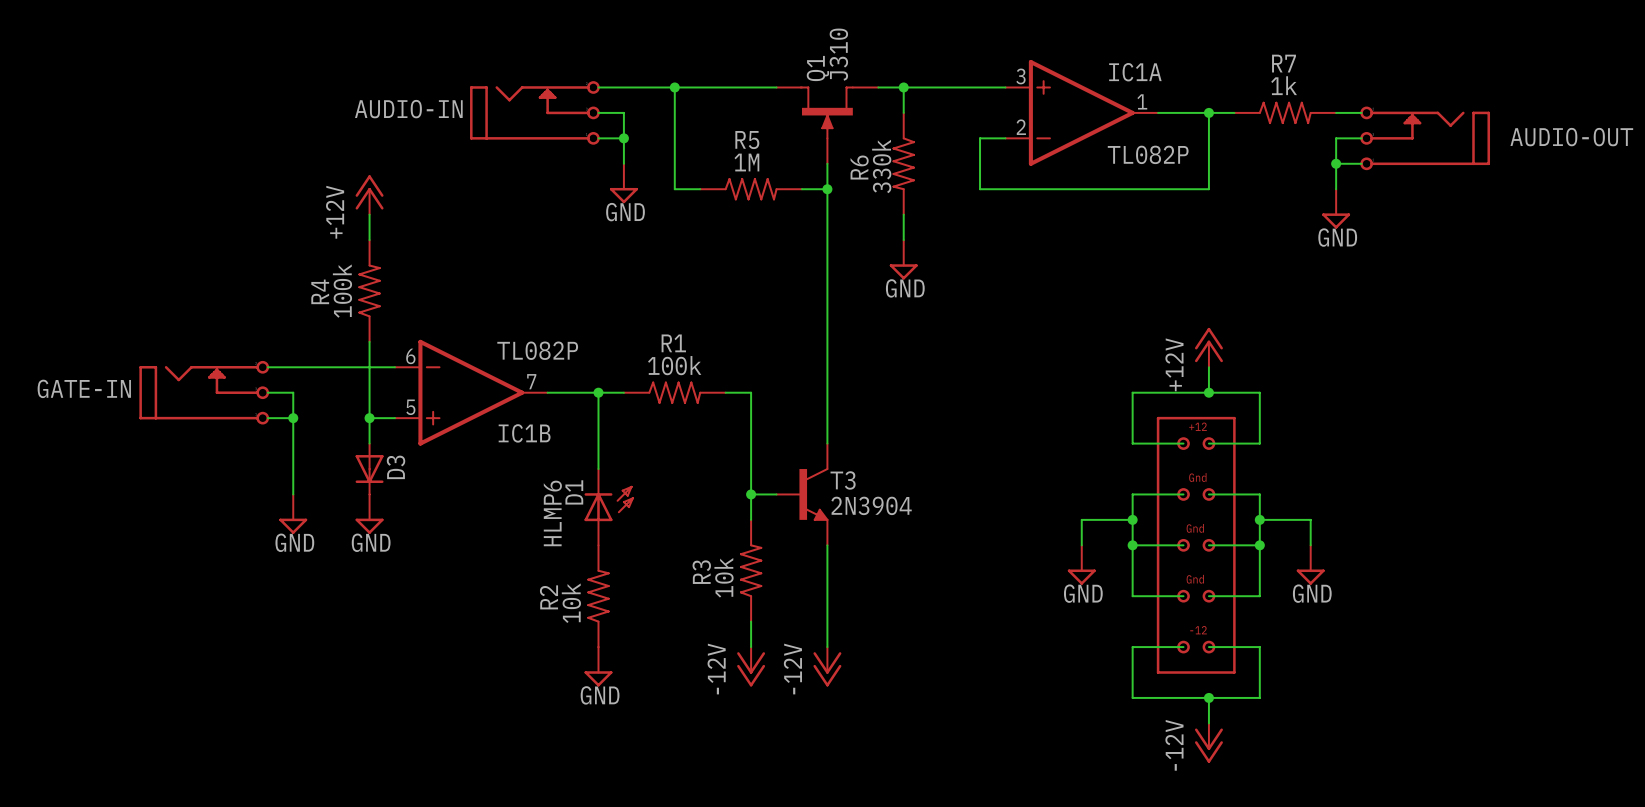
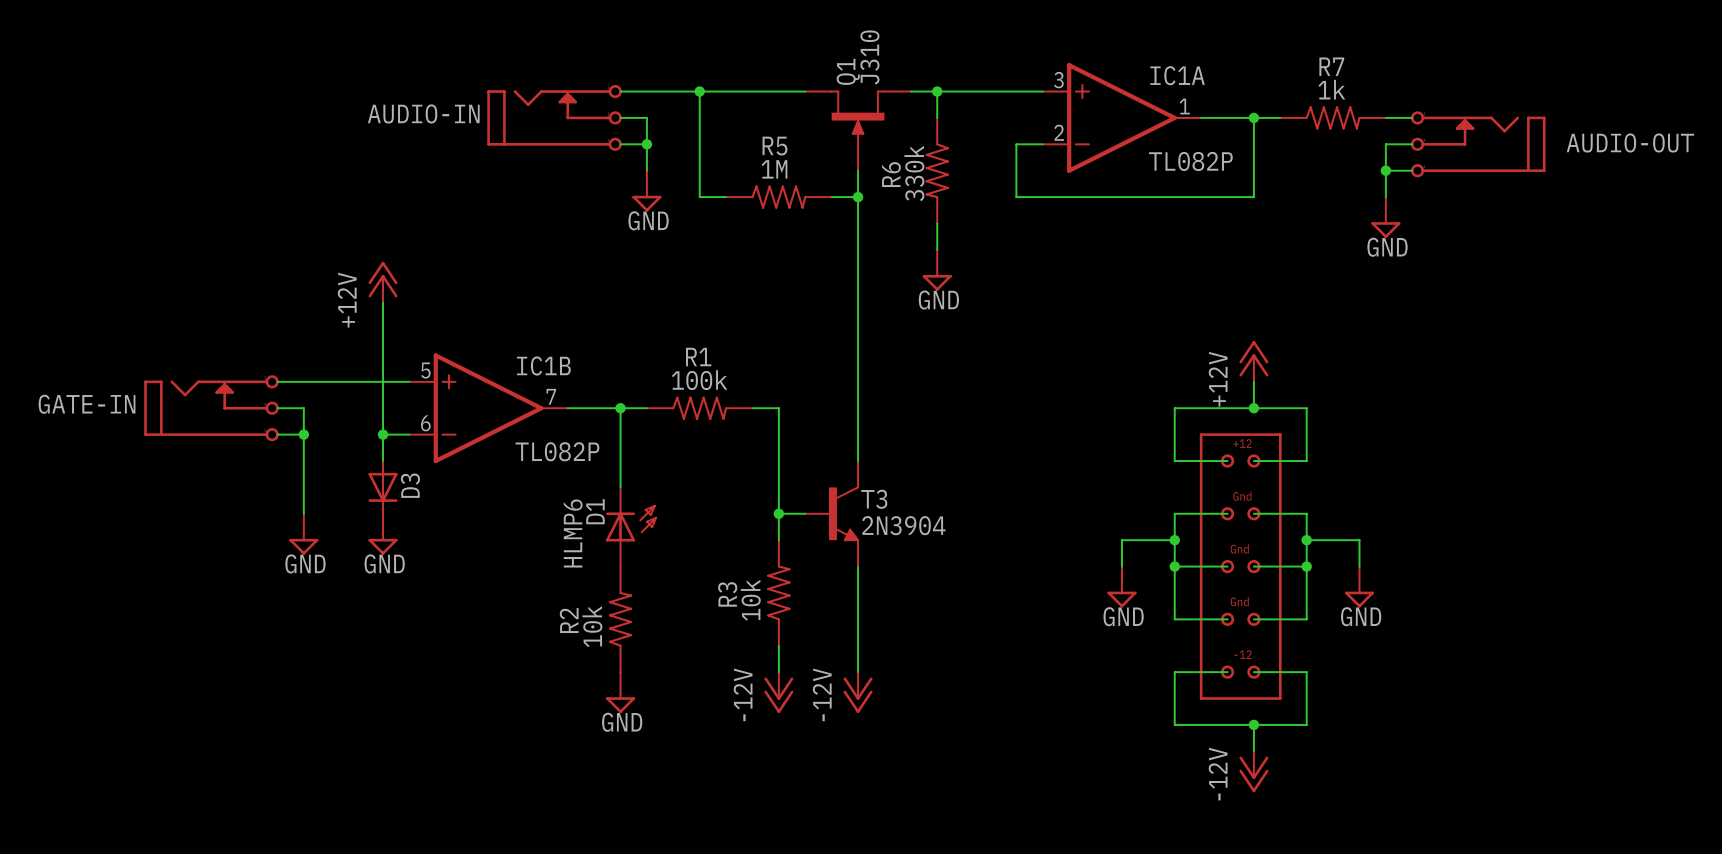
power symbol position: +12V (369, 194) -> +12V (383, 282)
wire: (369, 214) (369, 240) -> none
R4: 100k (369, 290) -> none
IC1B flip: as is (471, 392) -> up-down (488, 408)

